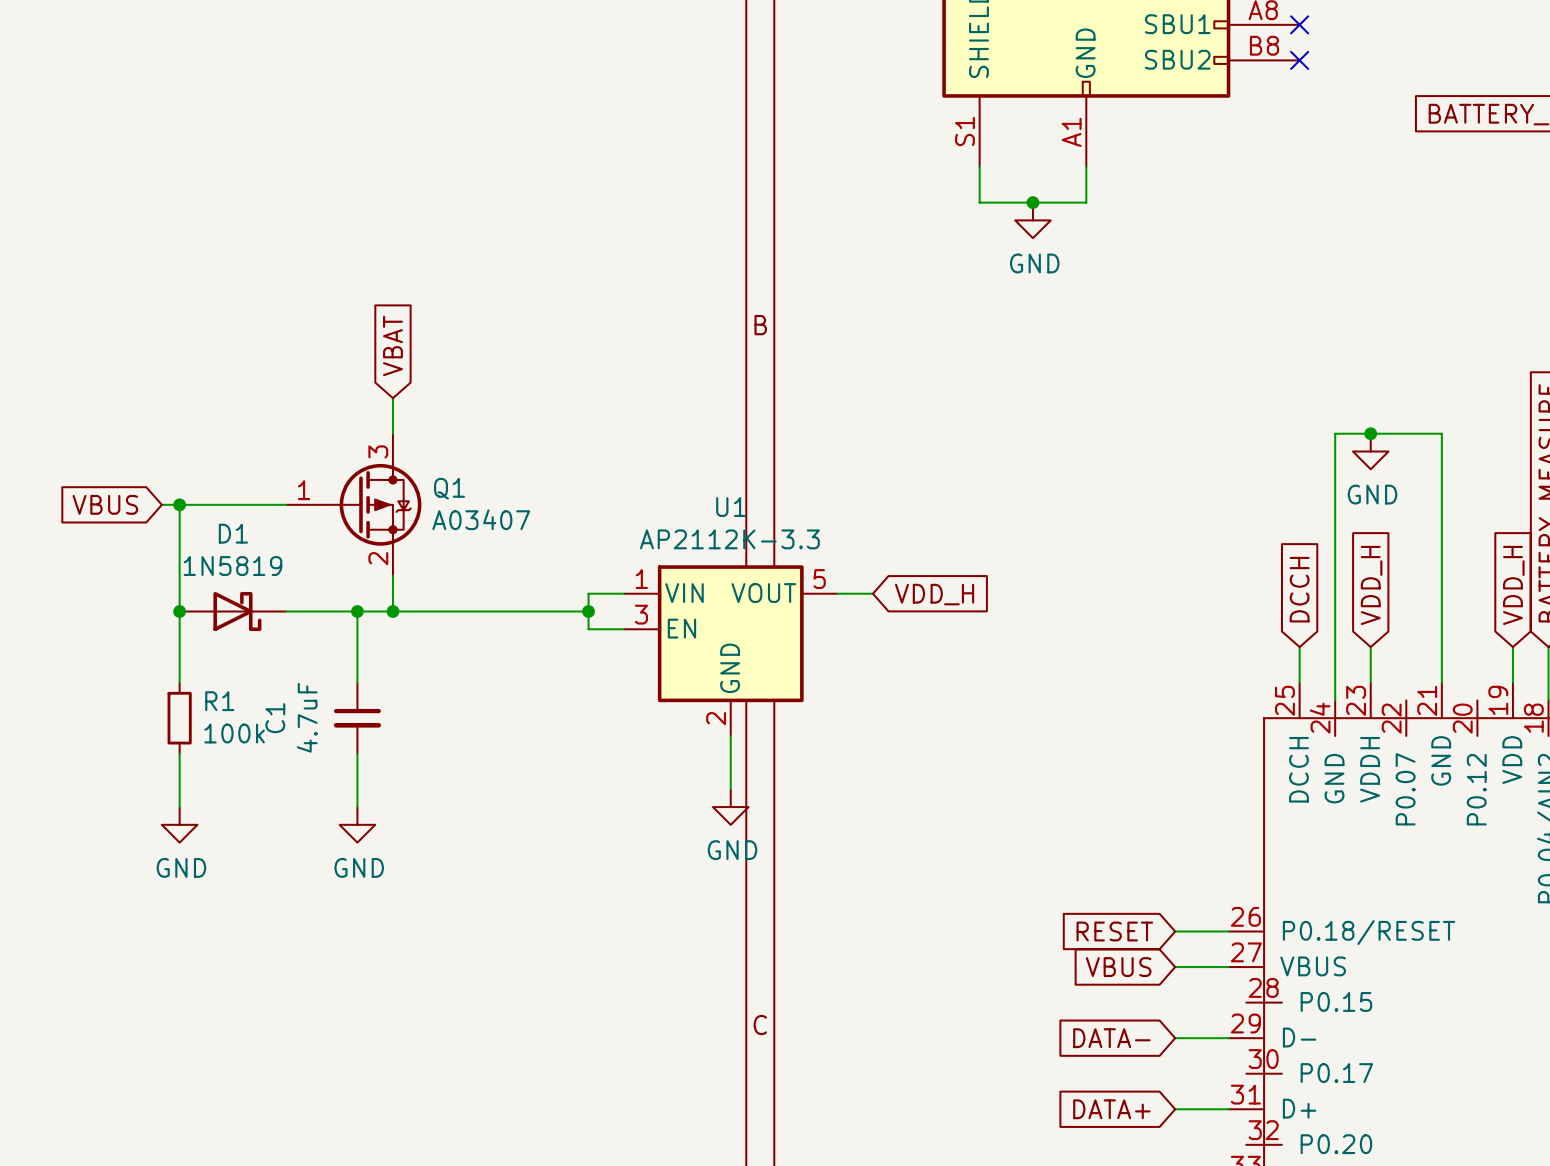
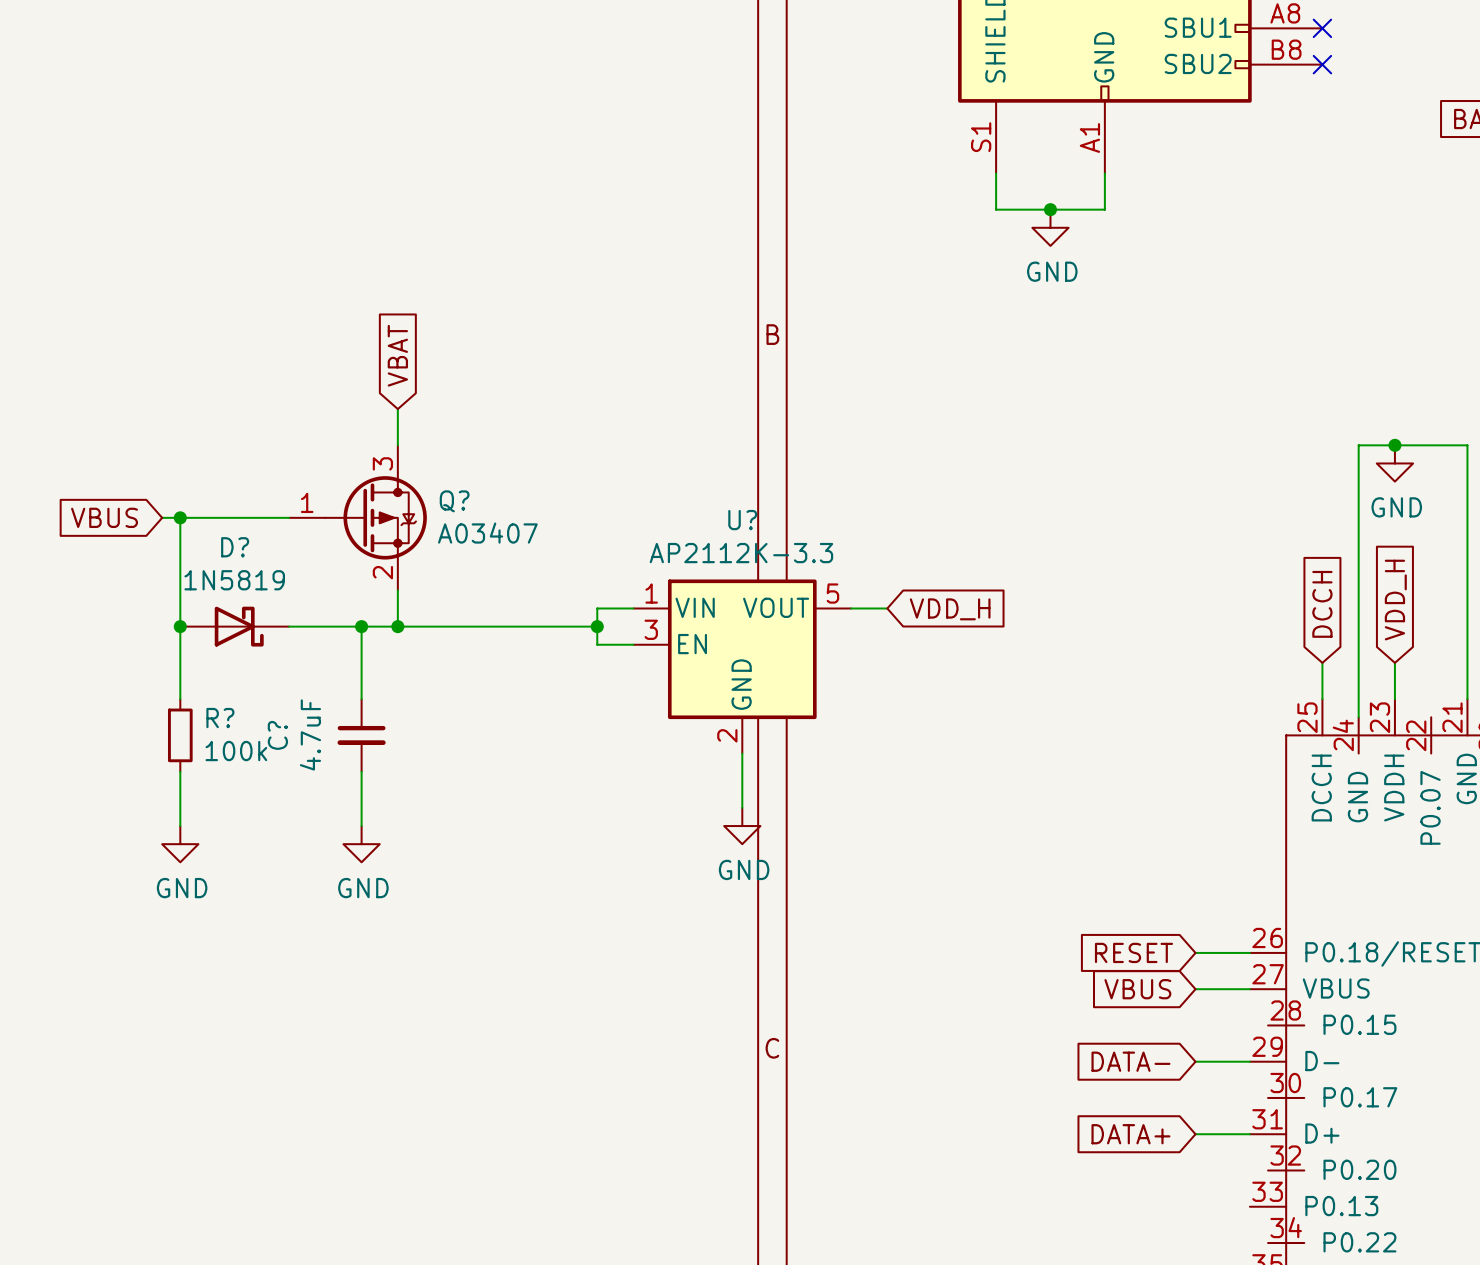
Q1 name: Q1 (449, 488) -> Q? (454, 501)
U1 name: U1 (731, 507) -> U? (742, 520)
D1 name: D1 (233, 533) -> D? (235, 547)
R1 name: R1 (219, 701) -> R? (220, 718)
C1 name: C1 (275, 718) -> C? (277, 735)

